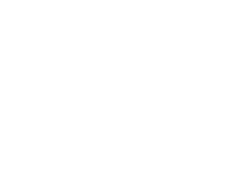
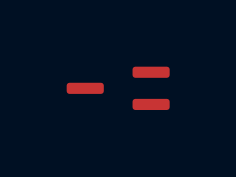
part: none -> (118, 88)

